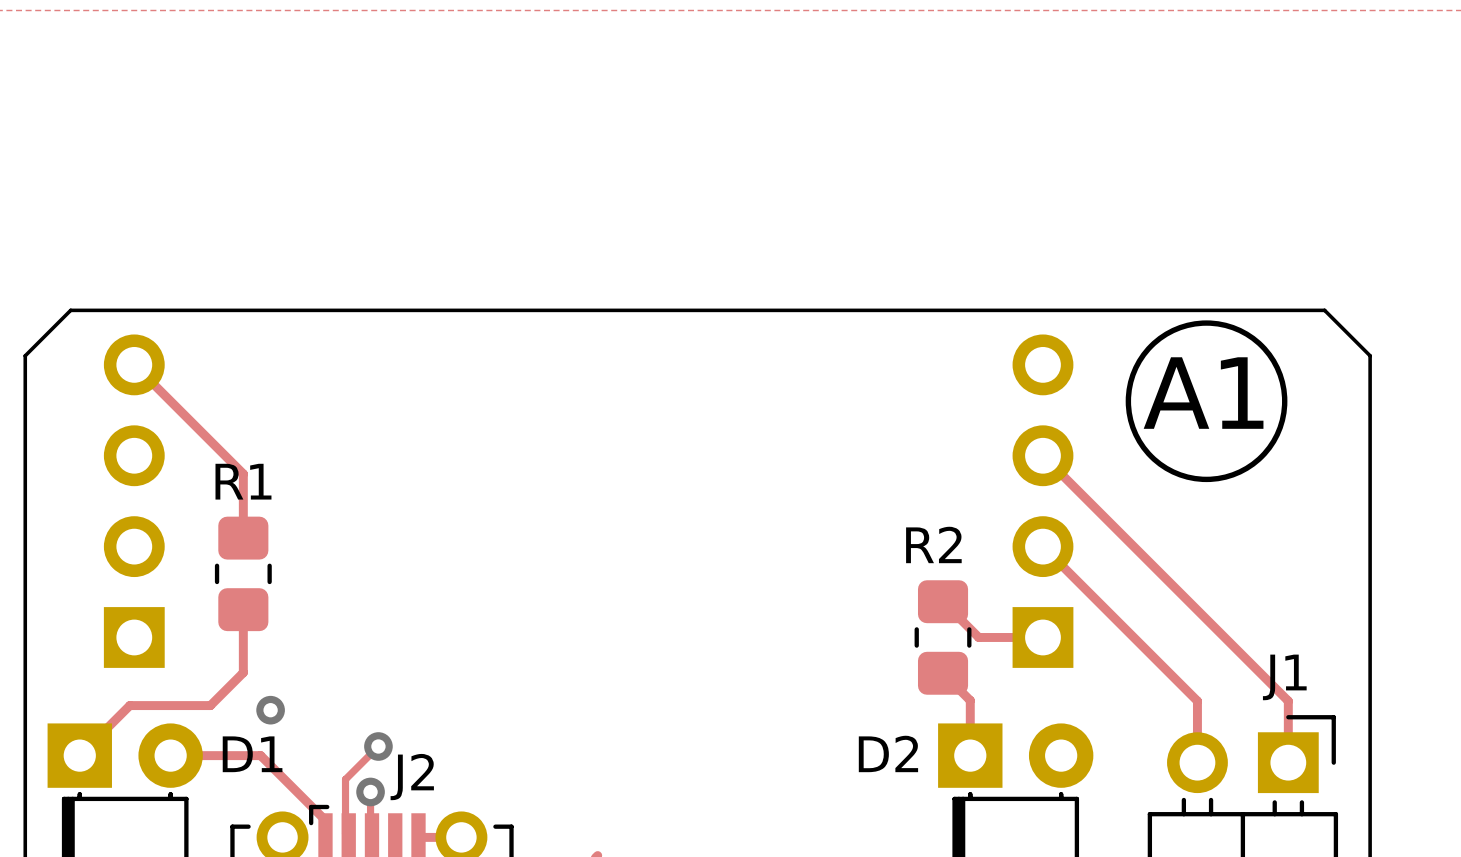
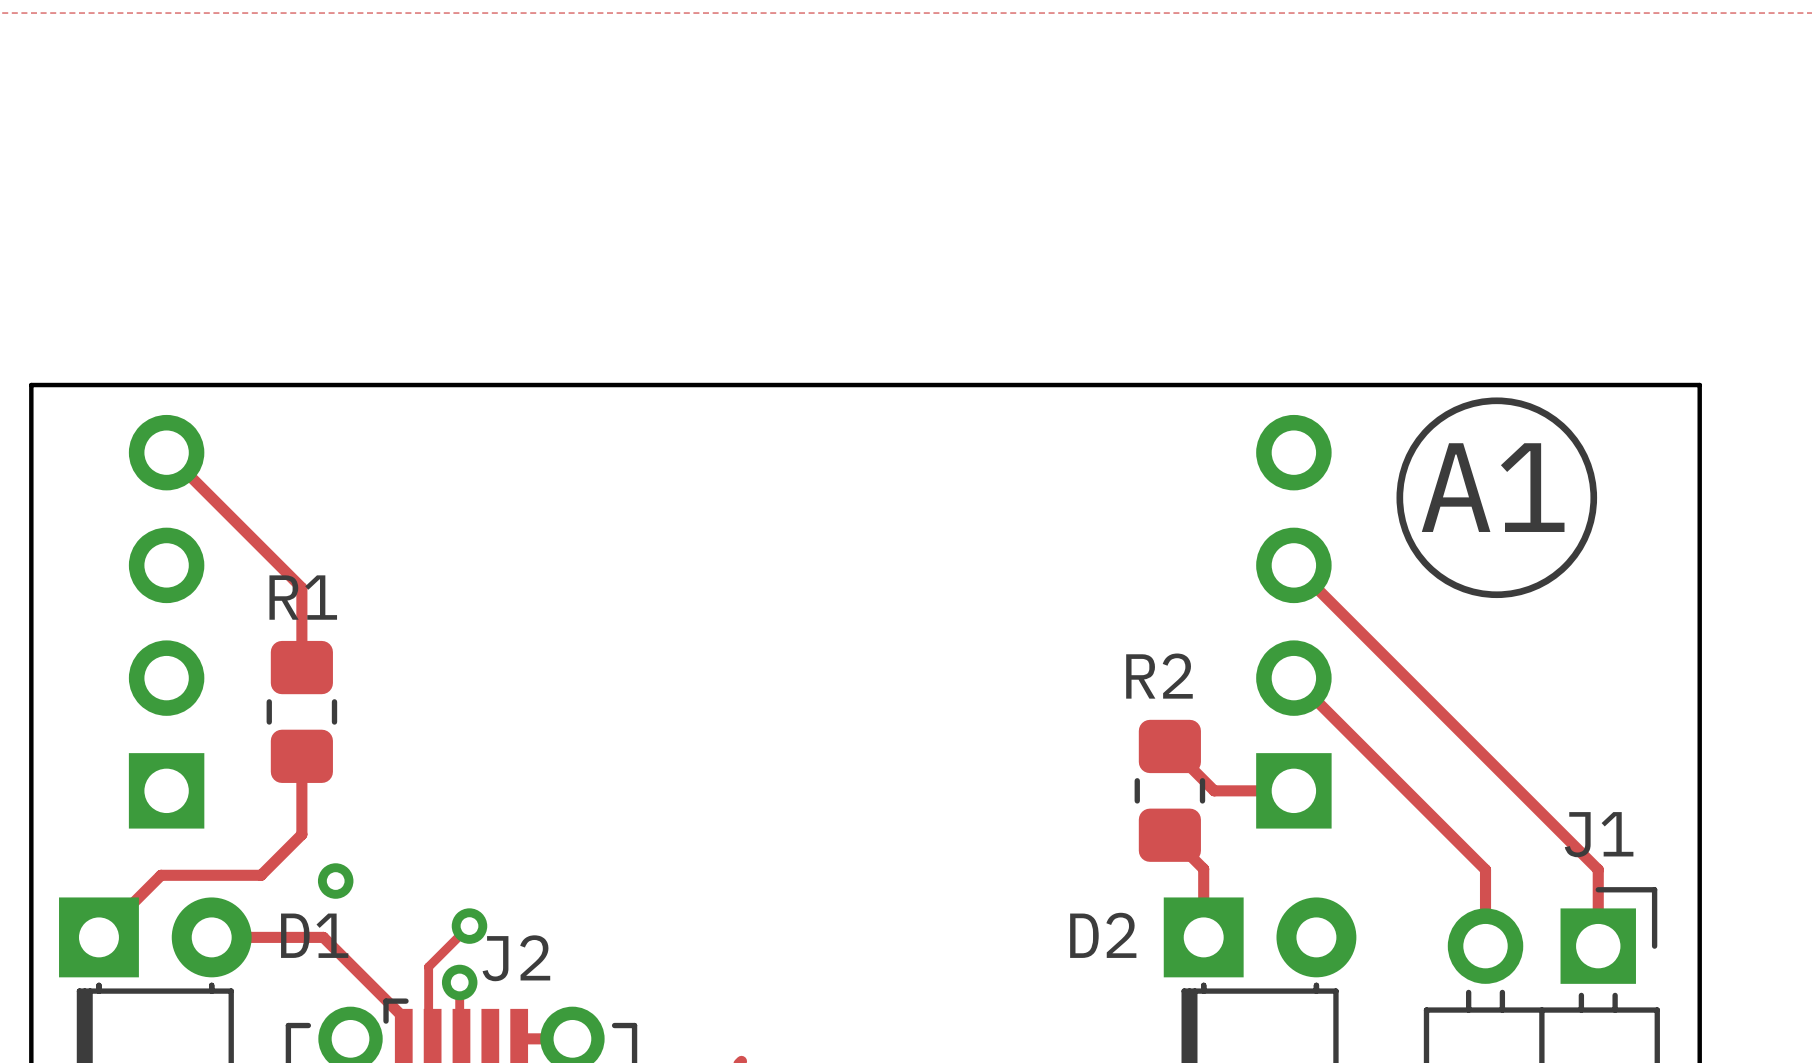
board edge: (70, 310) (25, 355) -> (87, 385) (31, 385) (31, 441)
board edge: (1324, 310) (1370, 355) -> (1643, 385) (1699, 385) (1699, 441)

